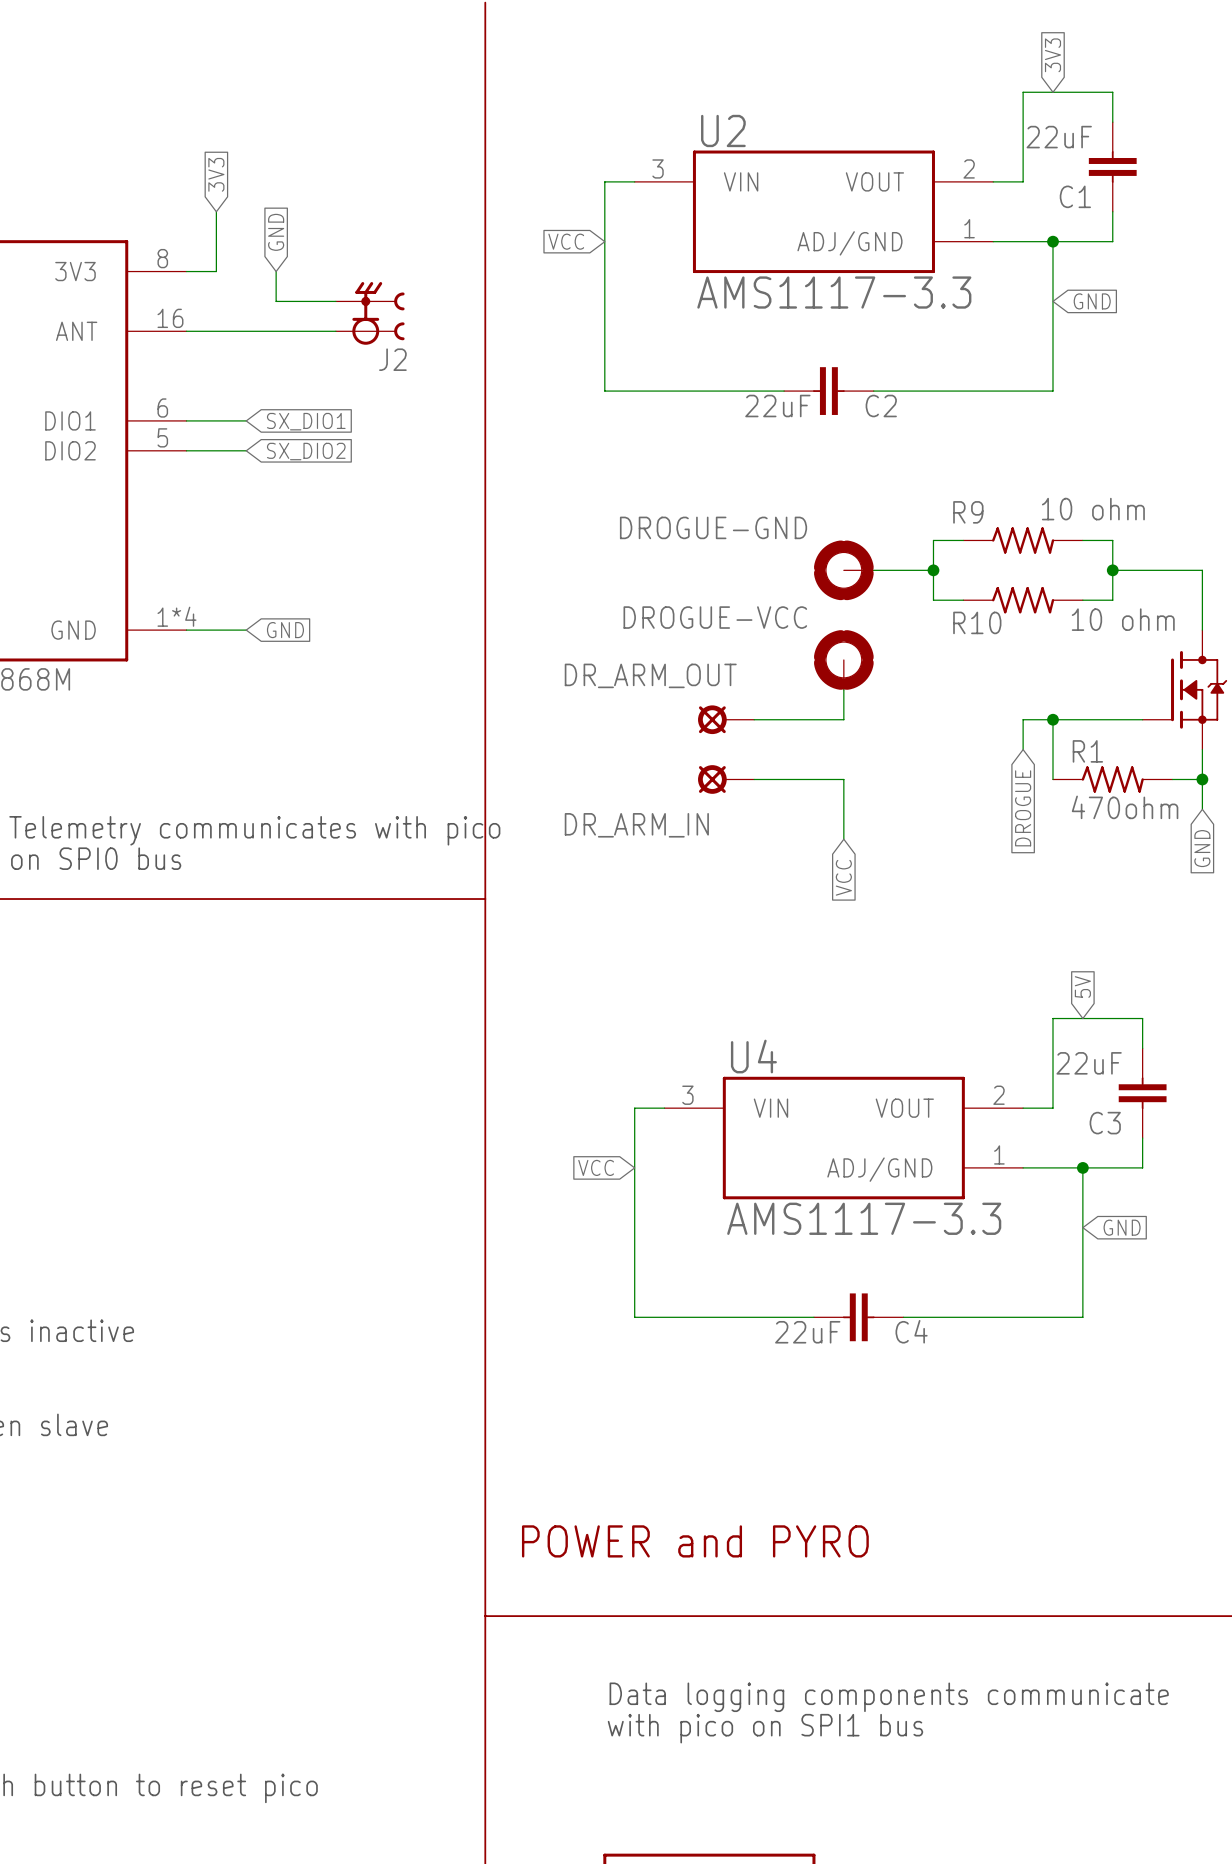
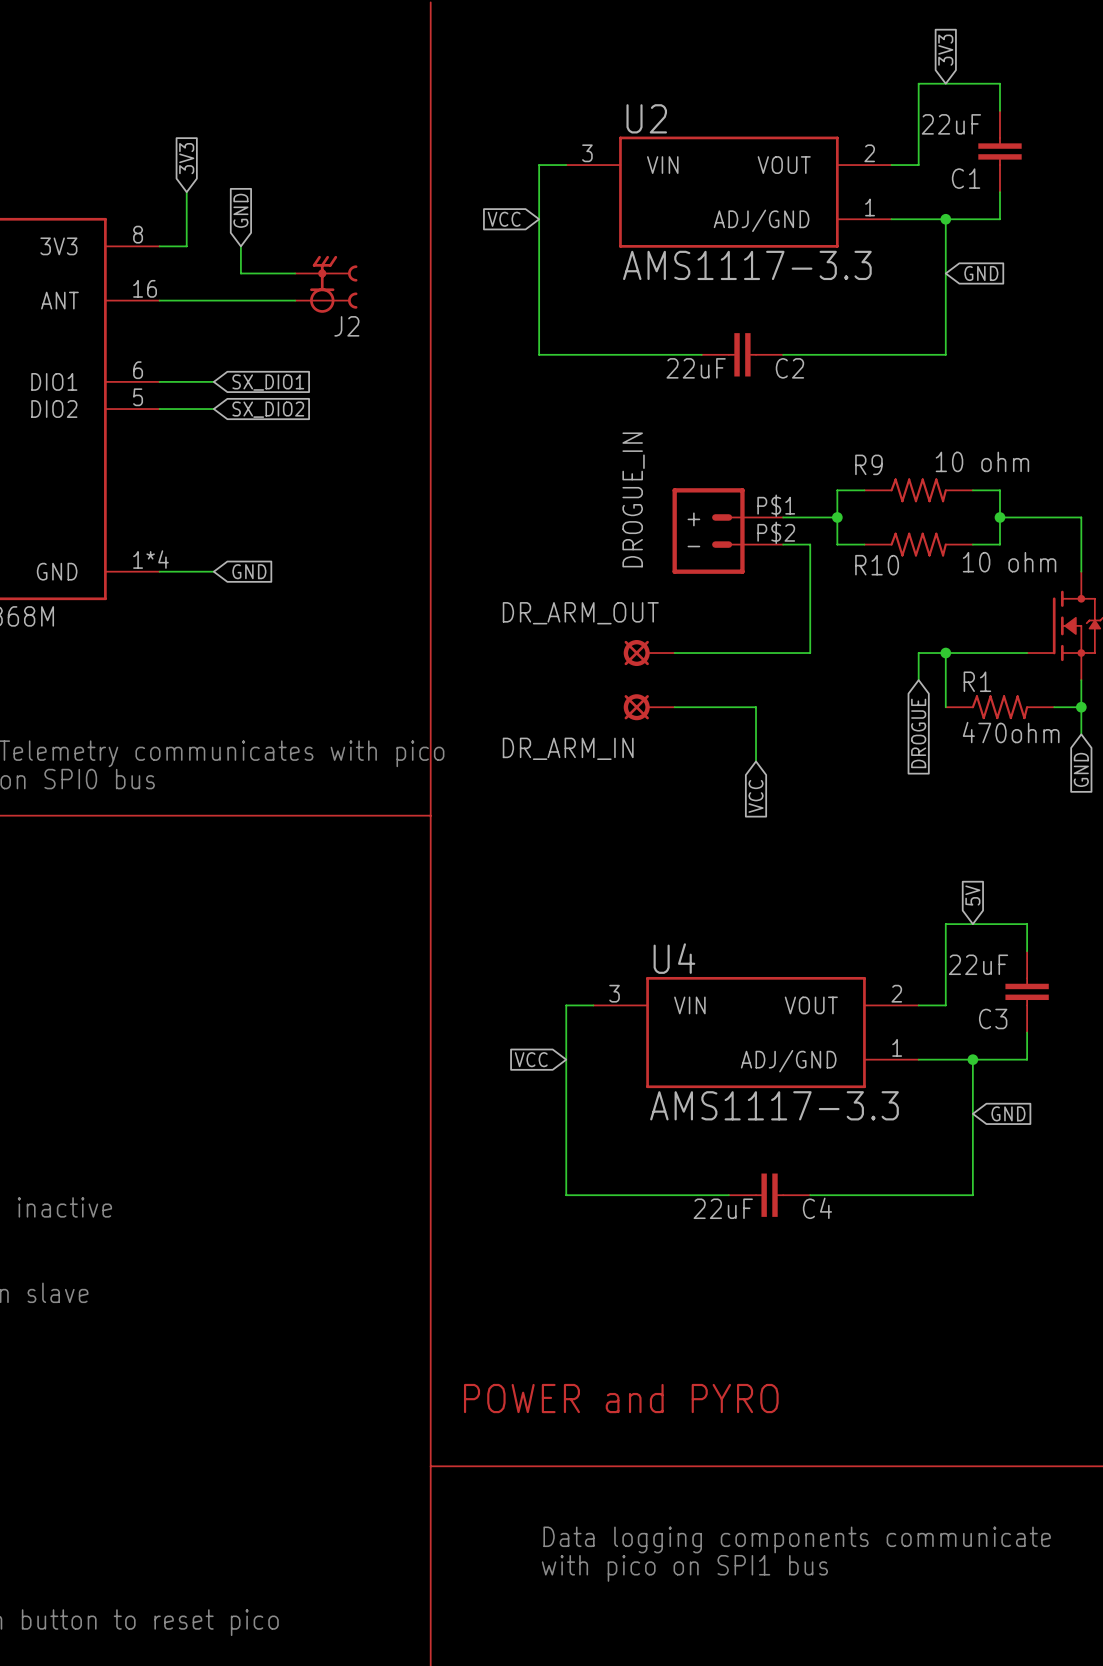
DROGUE-GND: (843, 570) -> none
DROGUE_IN: none -> (727, 531)
DROGUE-VCC: (843, 659) -> none
wire: (843, 689) (843, 719) -> (783, 544) (810, 544) (810, 653) (756, 653)

